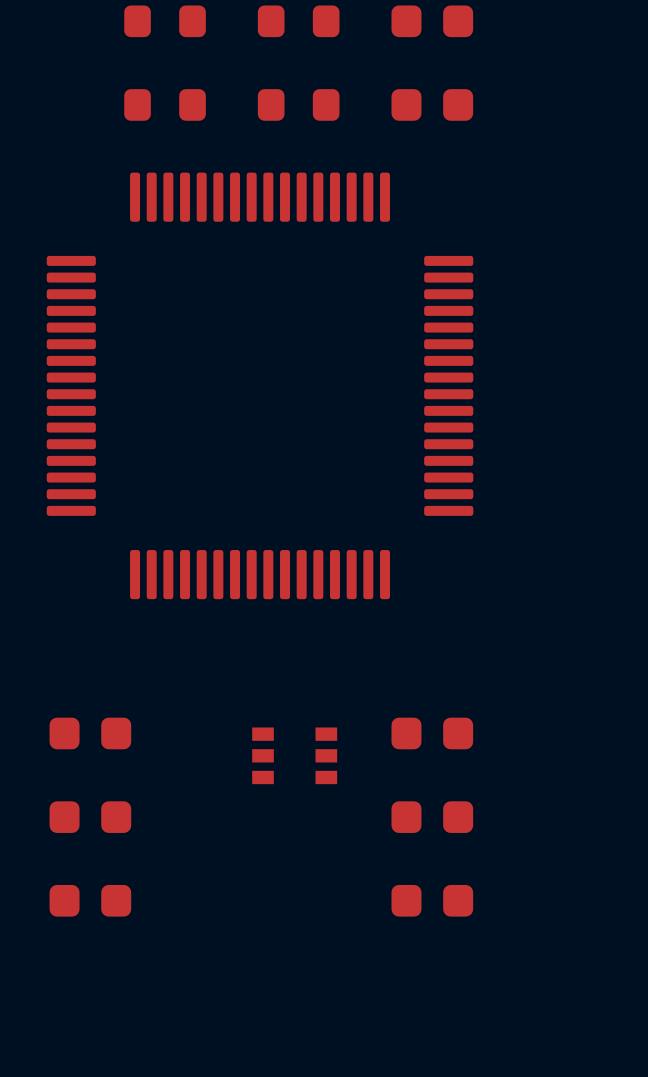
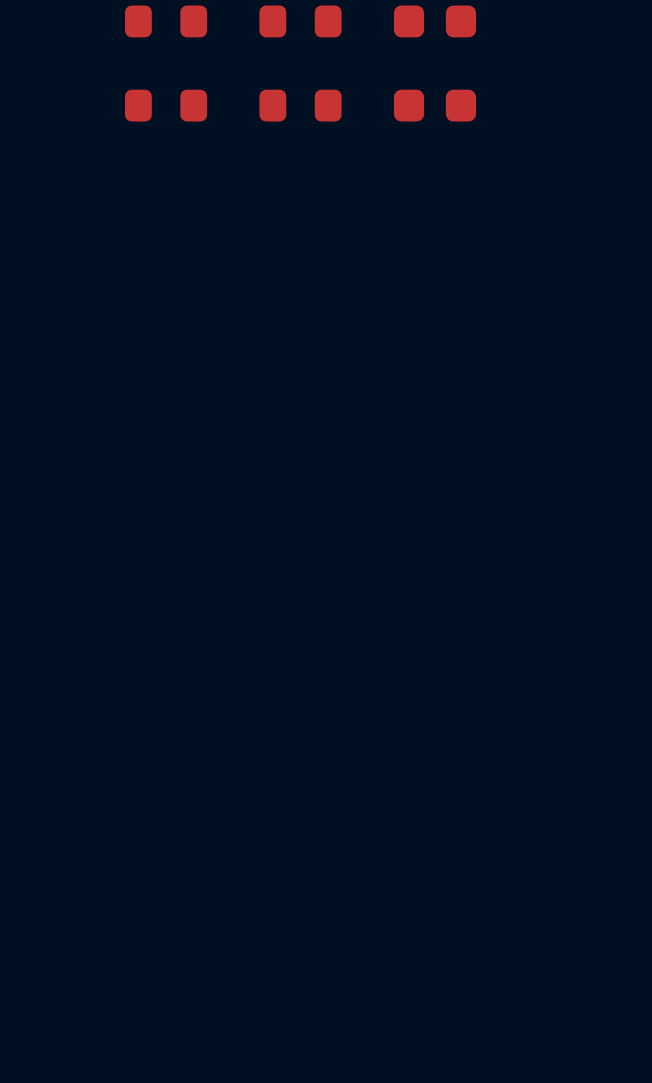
part: (260, 385) -> none
part: (90, 733) -> none
part: (432, 733) -> none
part: (294, 755) -> none
part: (90, 817) -> none
part: (432, 817) -> none
part: (90, 900) -> none
part: (432, 900) -> none

